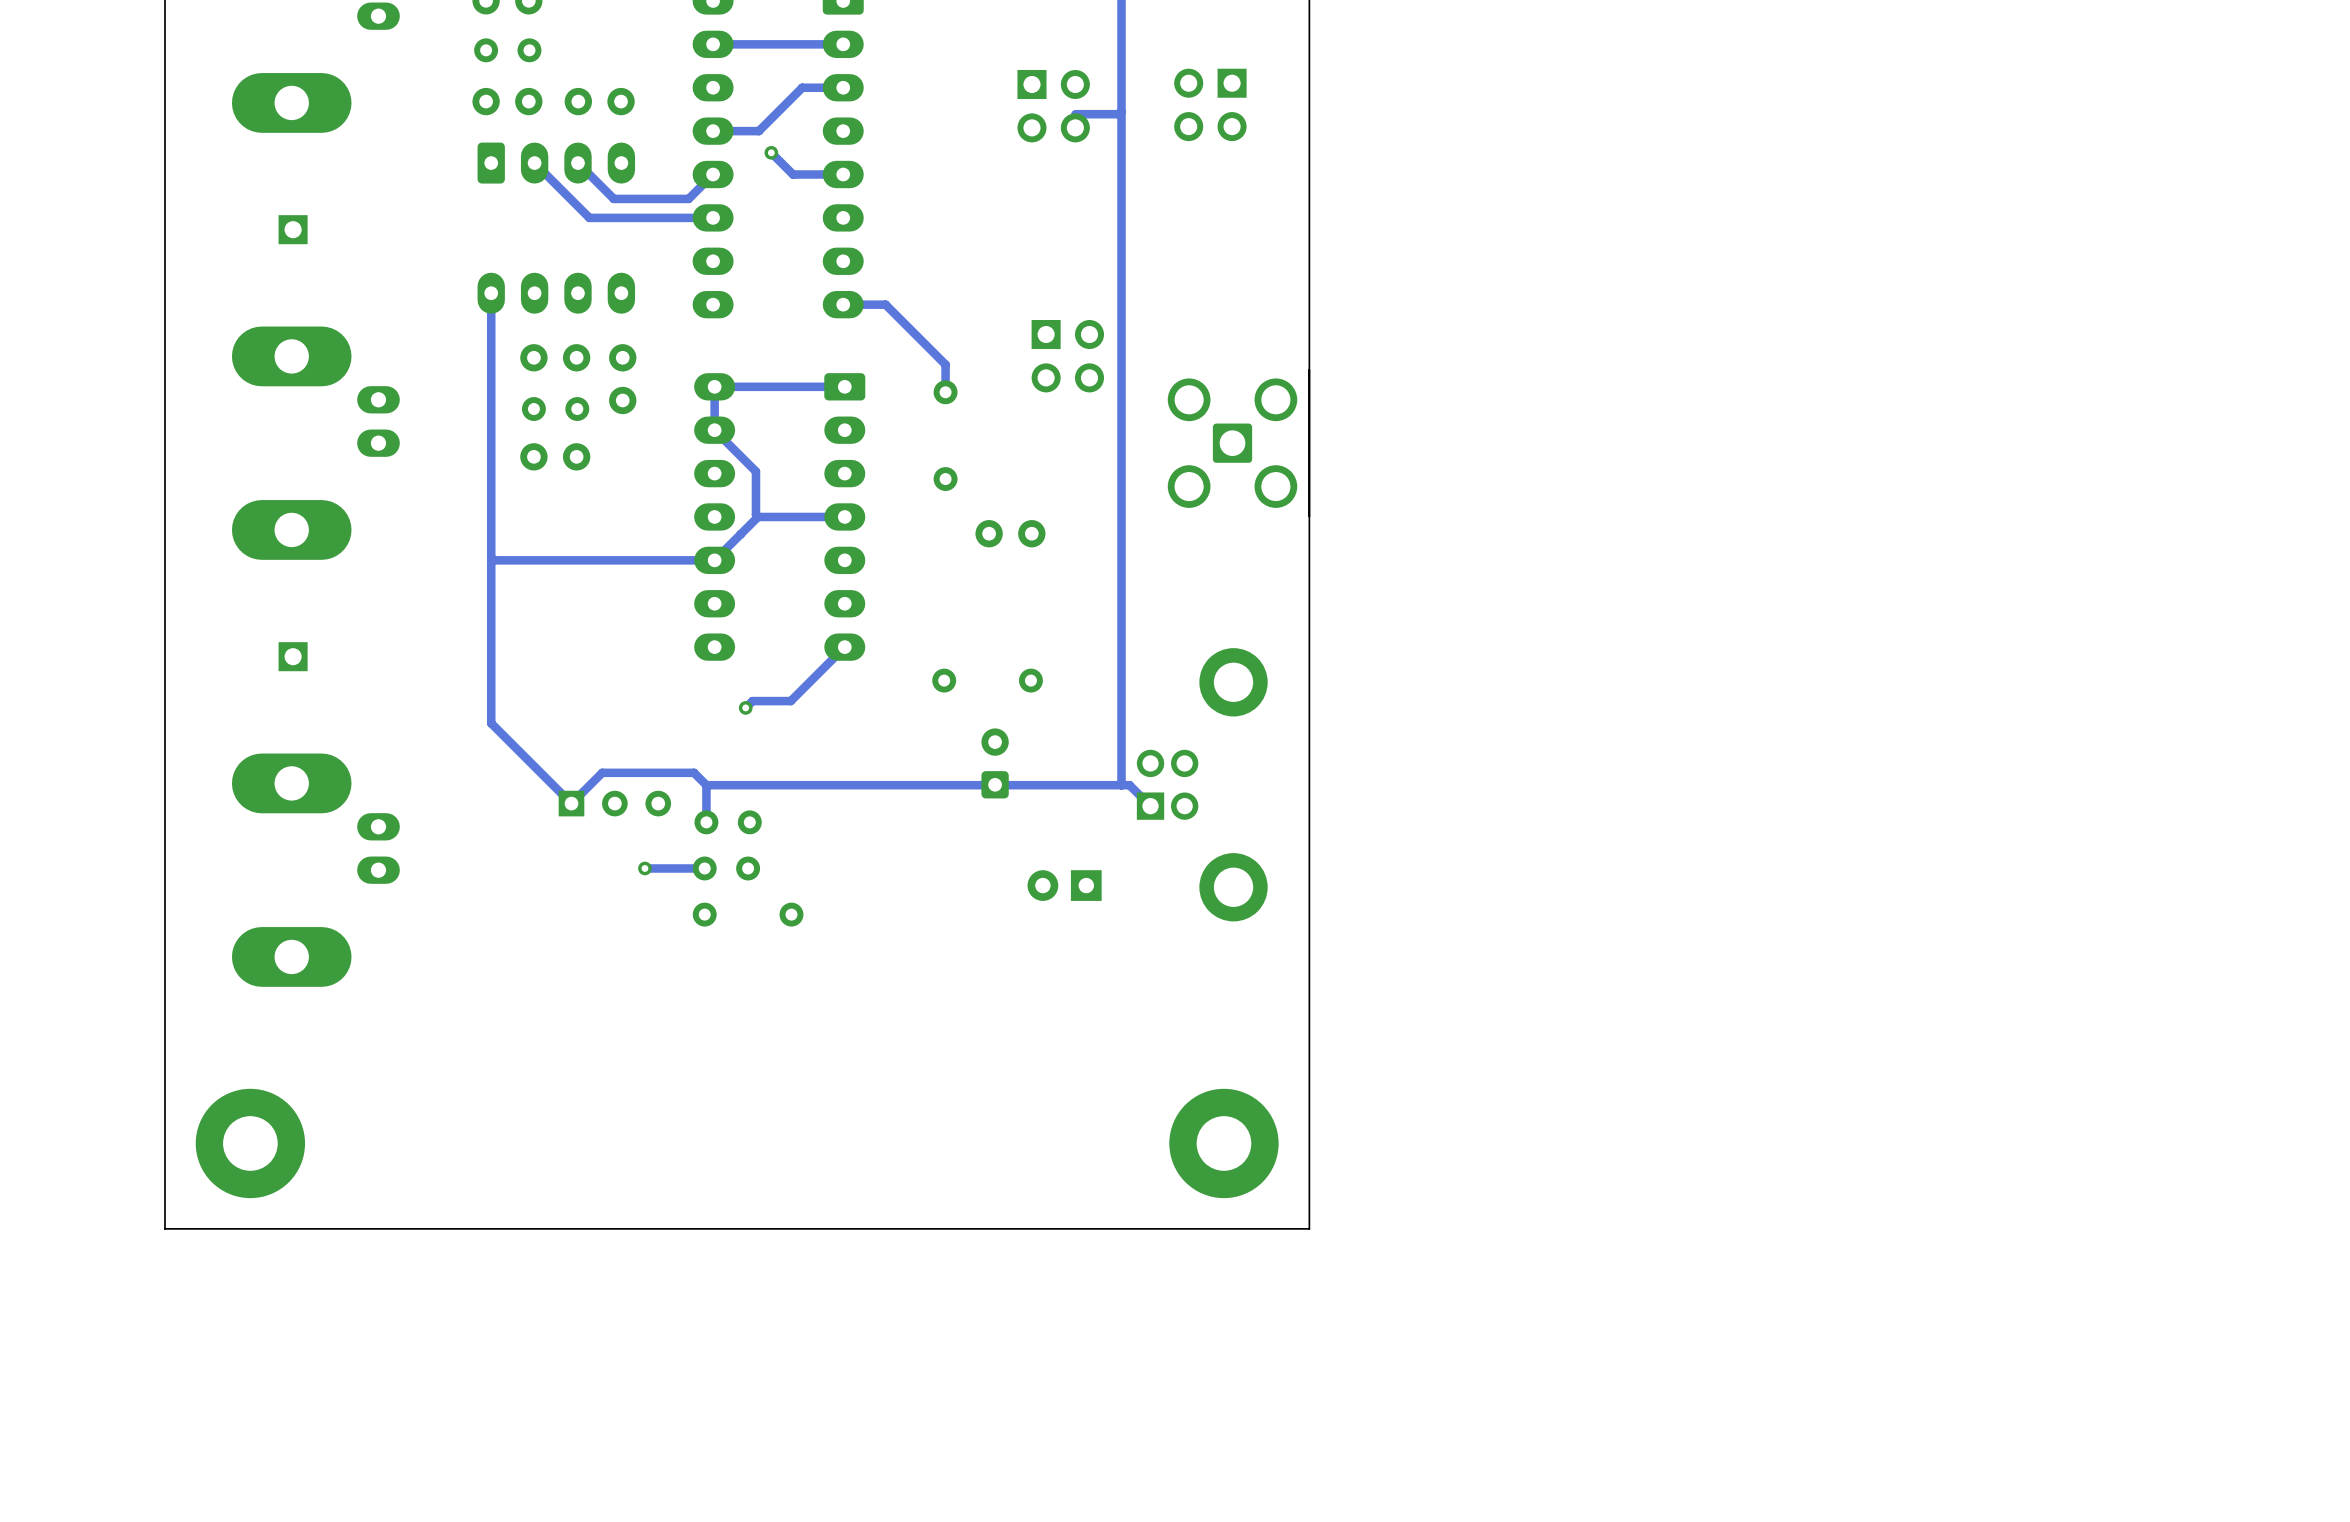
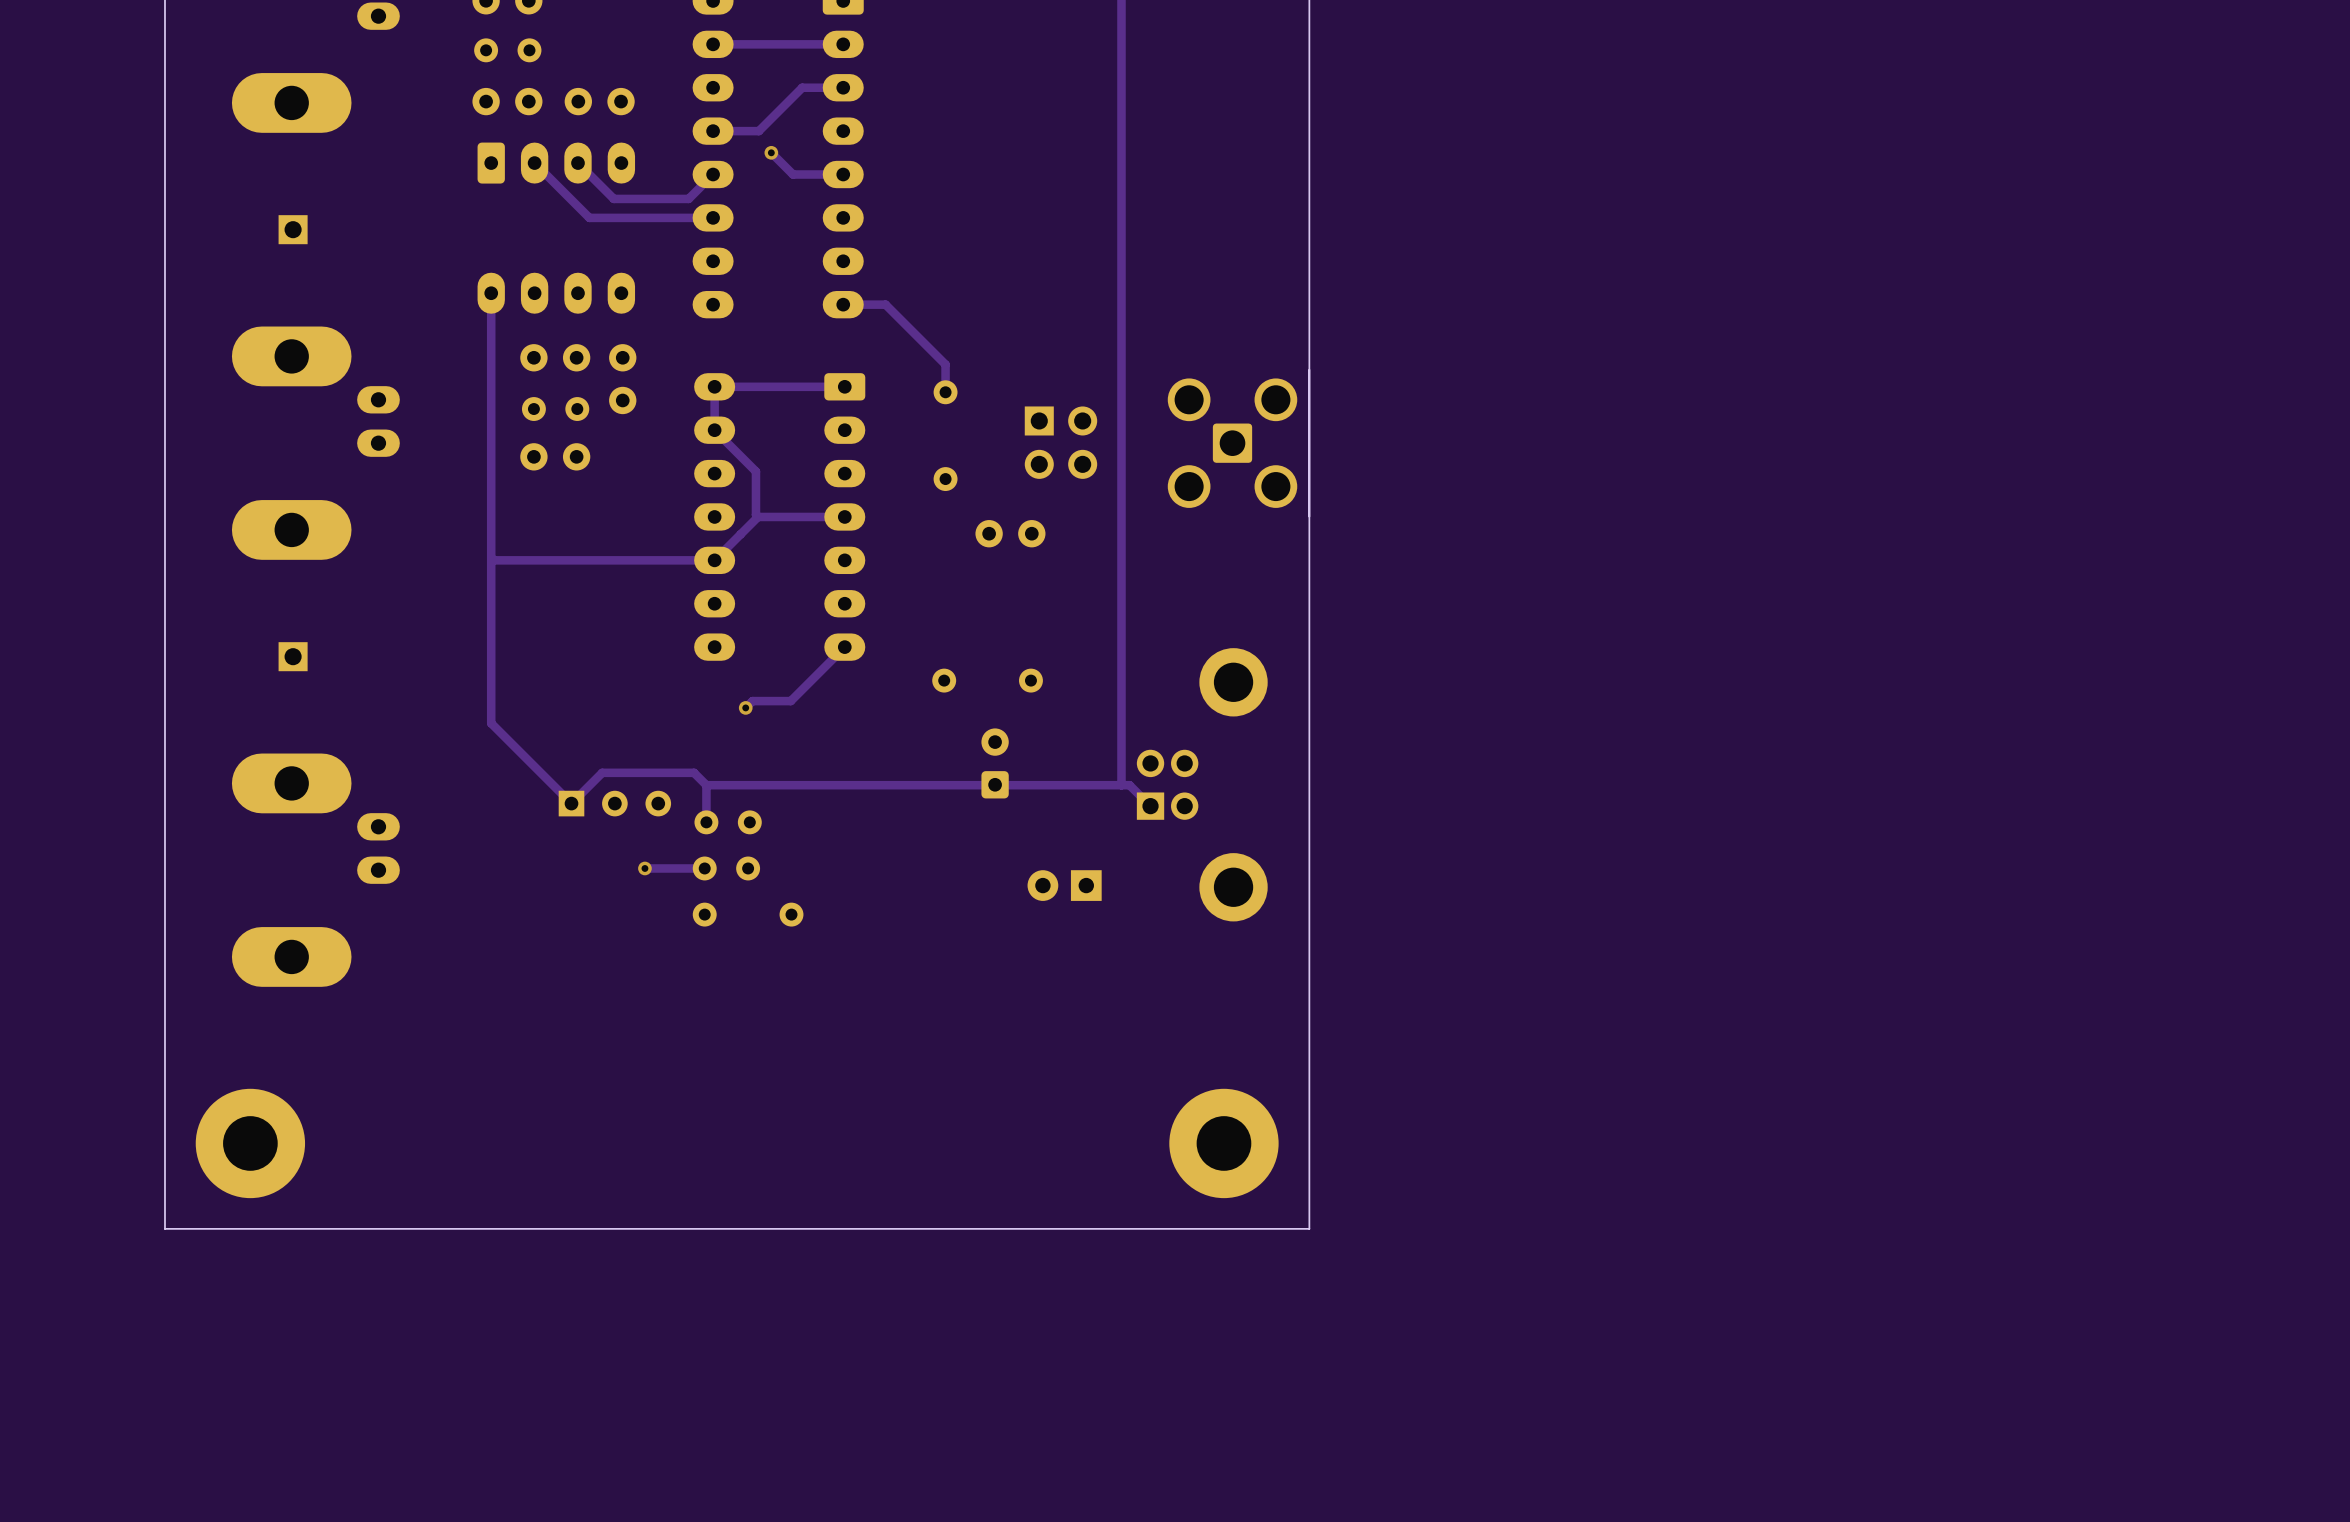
part: (1210, 104) -> none
part: (1053, 106) -> none
track: (1121, 111) (1119, 114) (1075, 114) -> none
part position: (1067, 356) -> (1060, 442)

